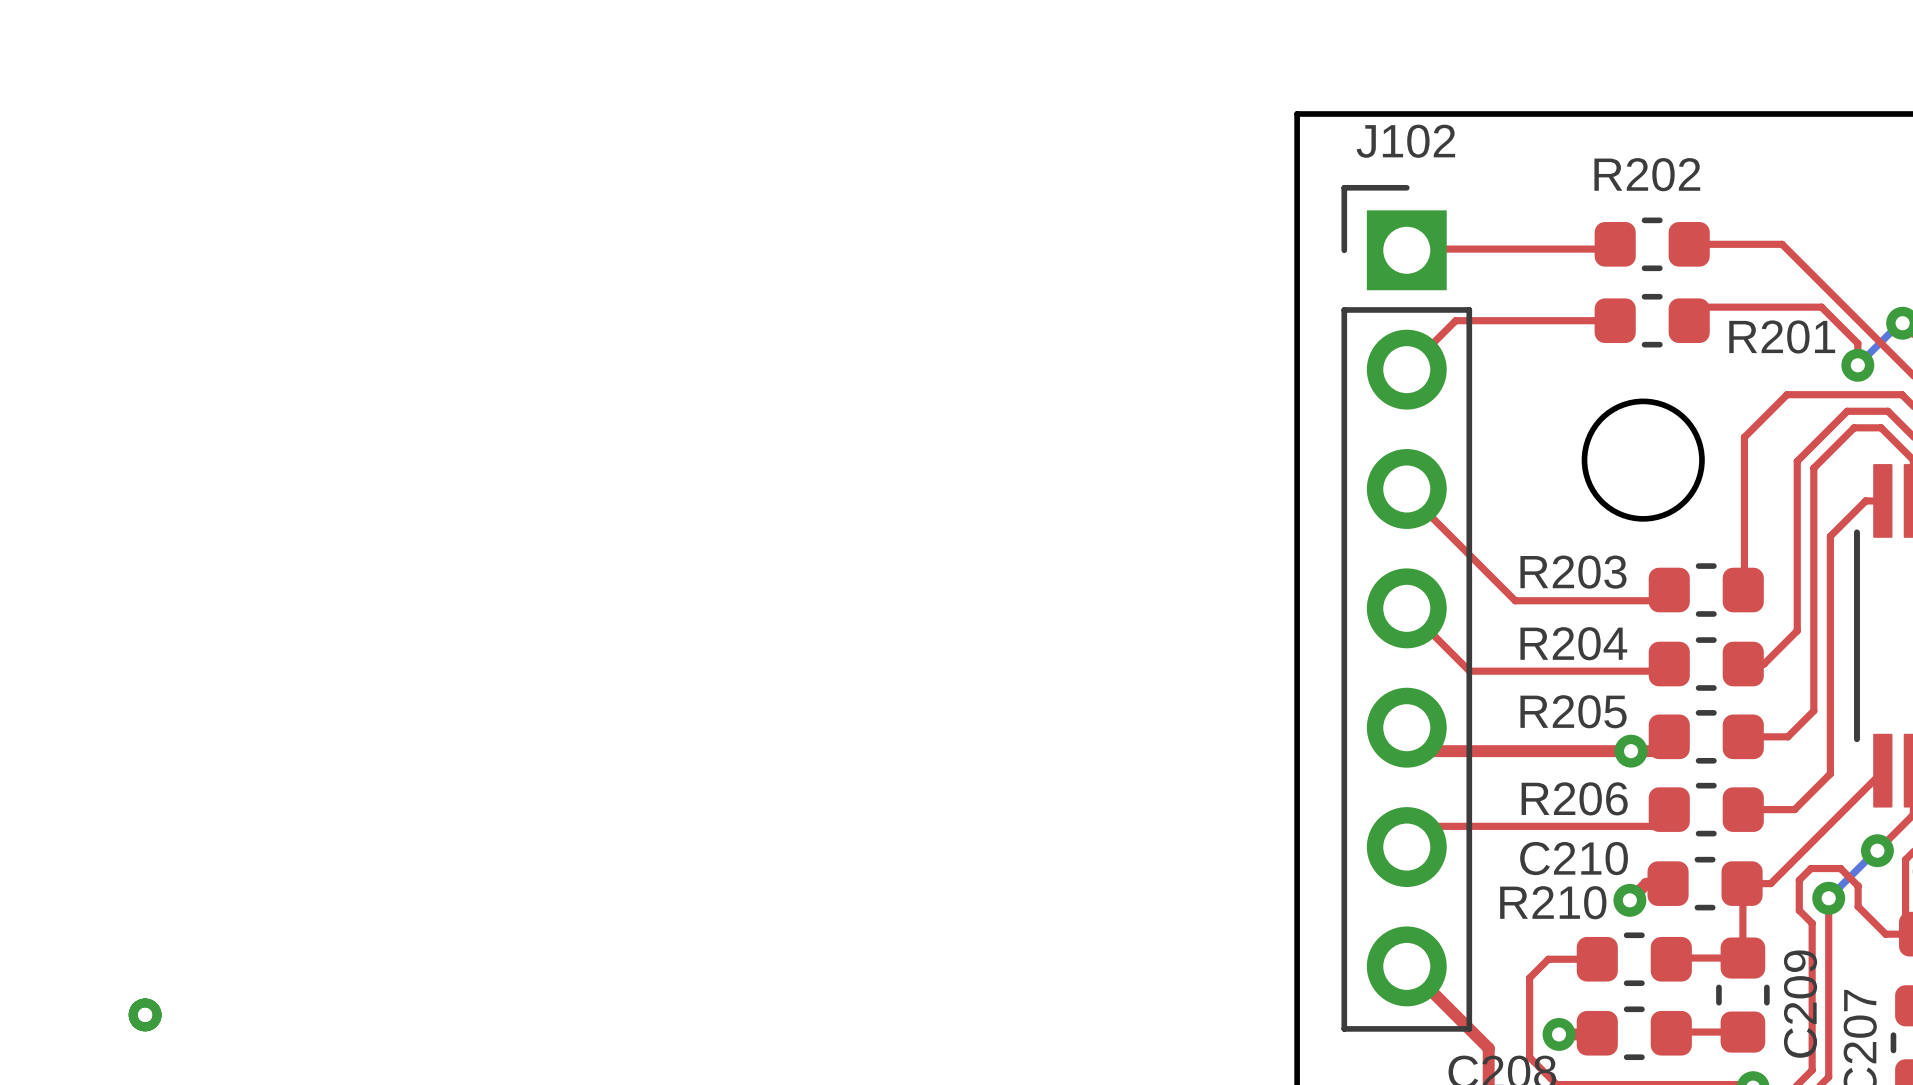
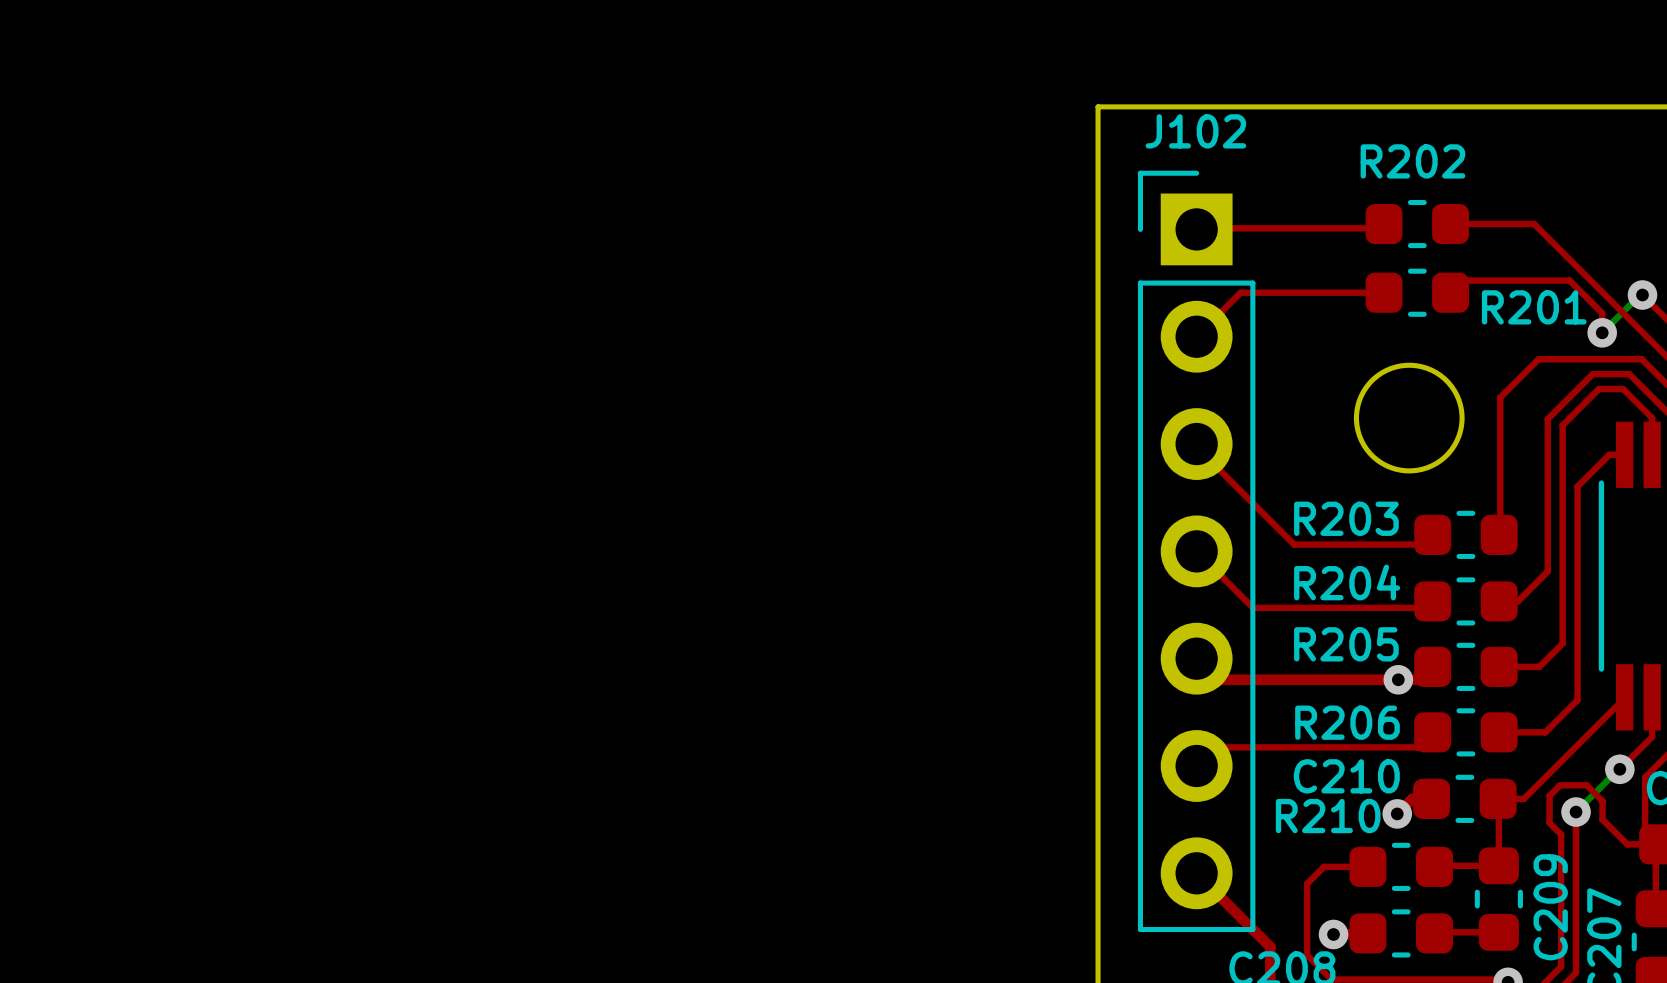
via: (145, 1014) -> none

